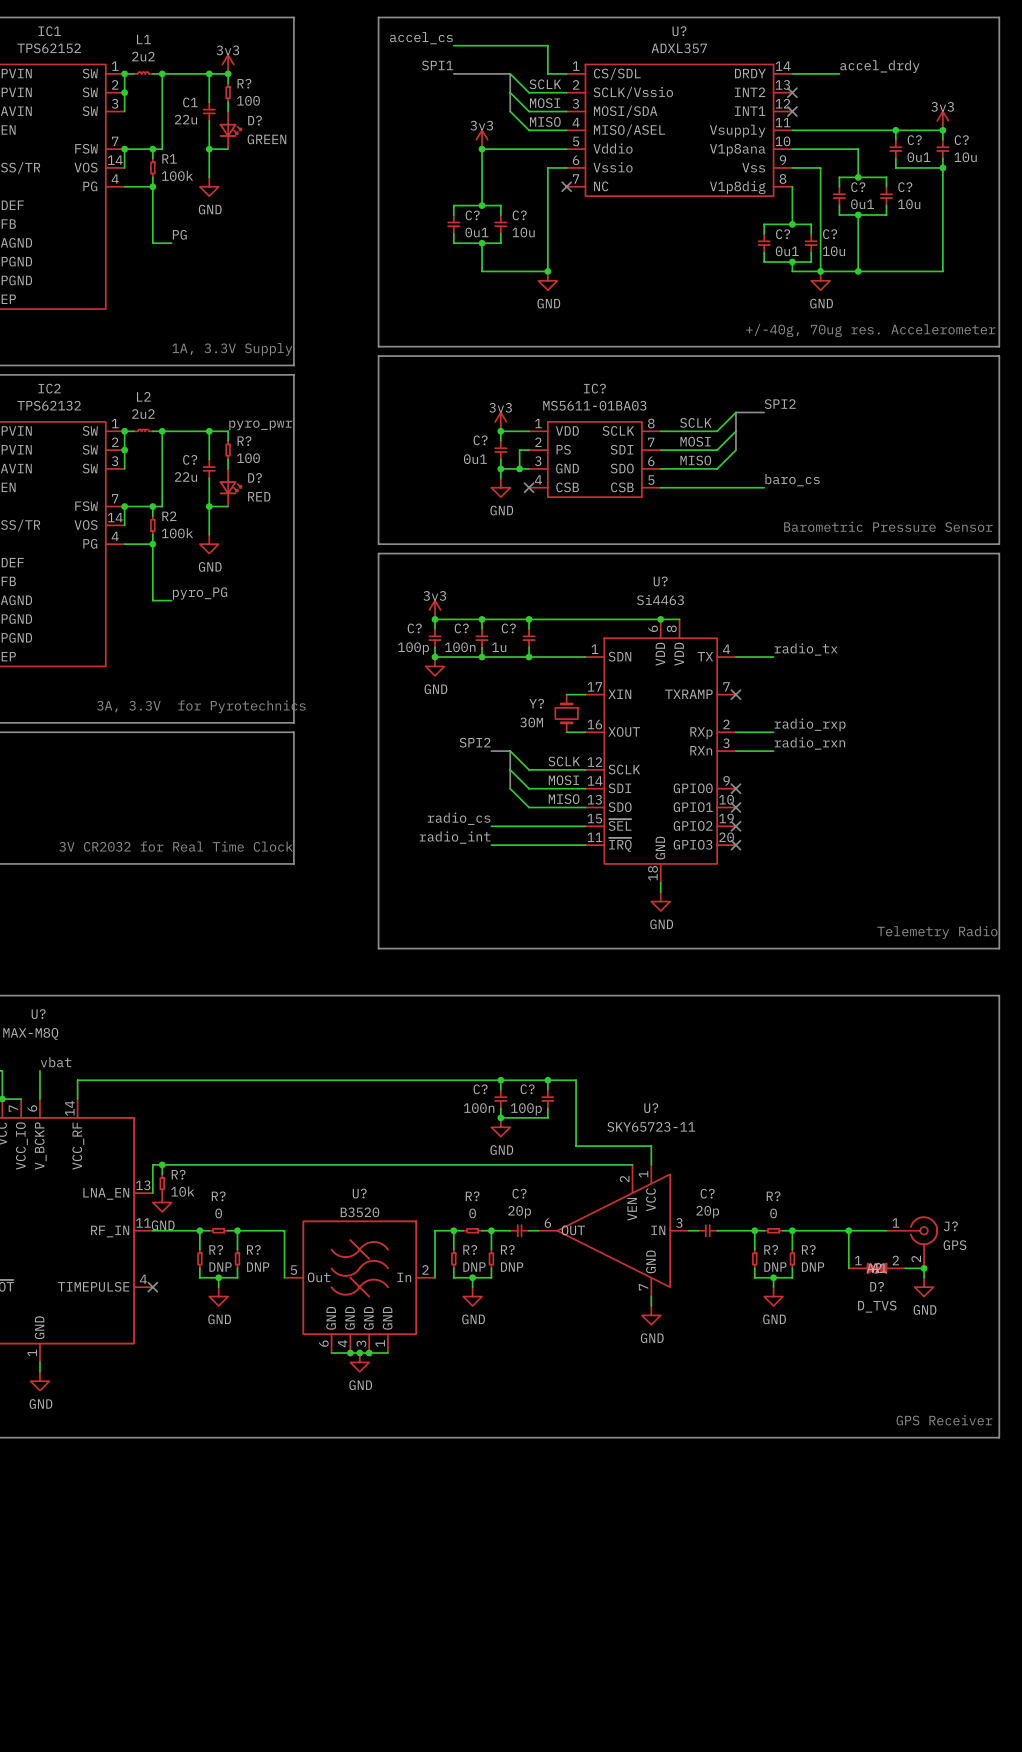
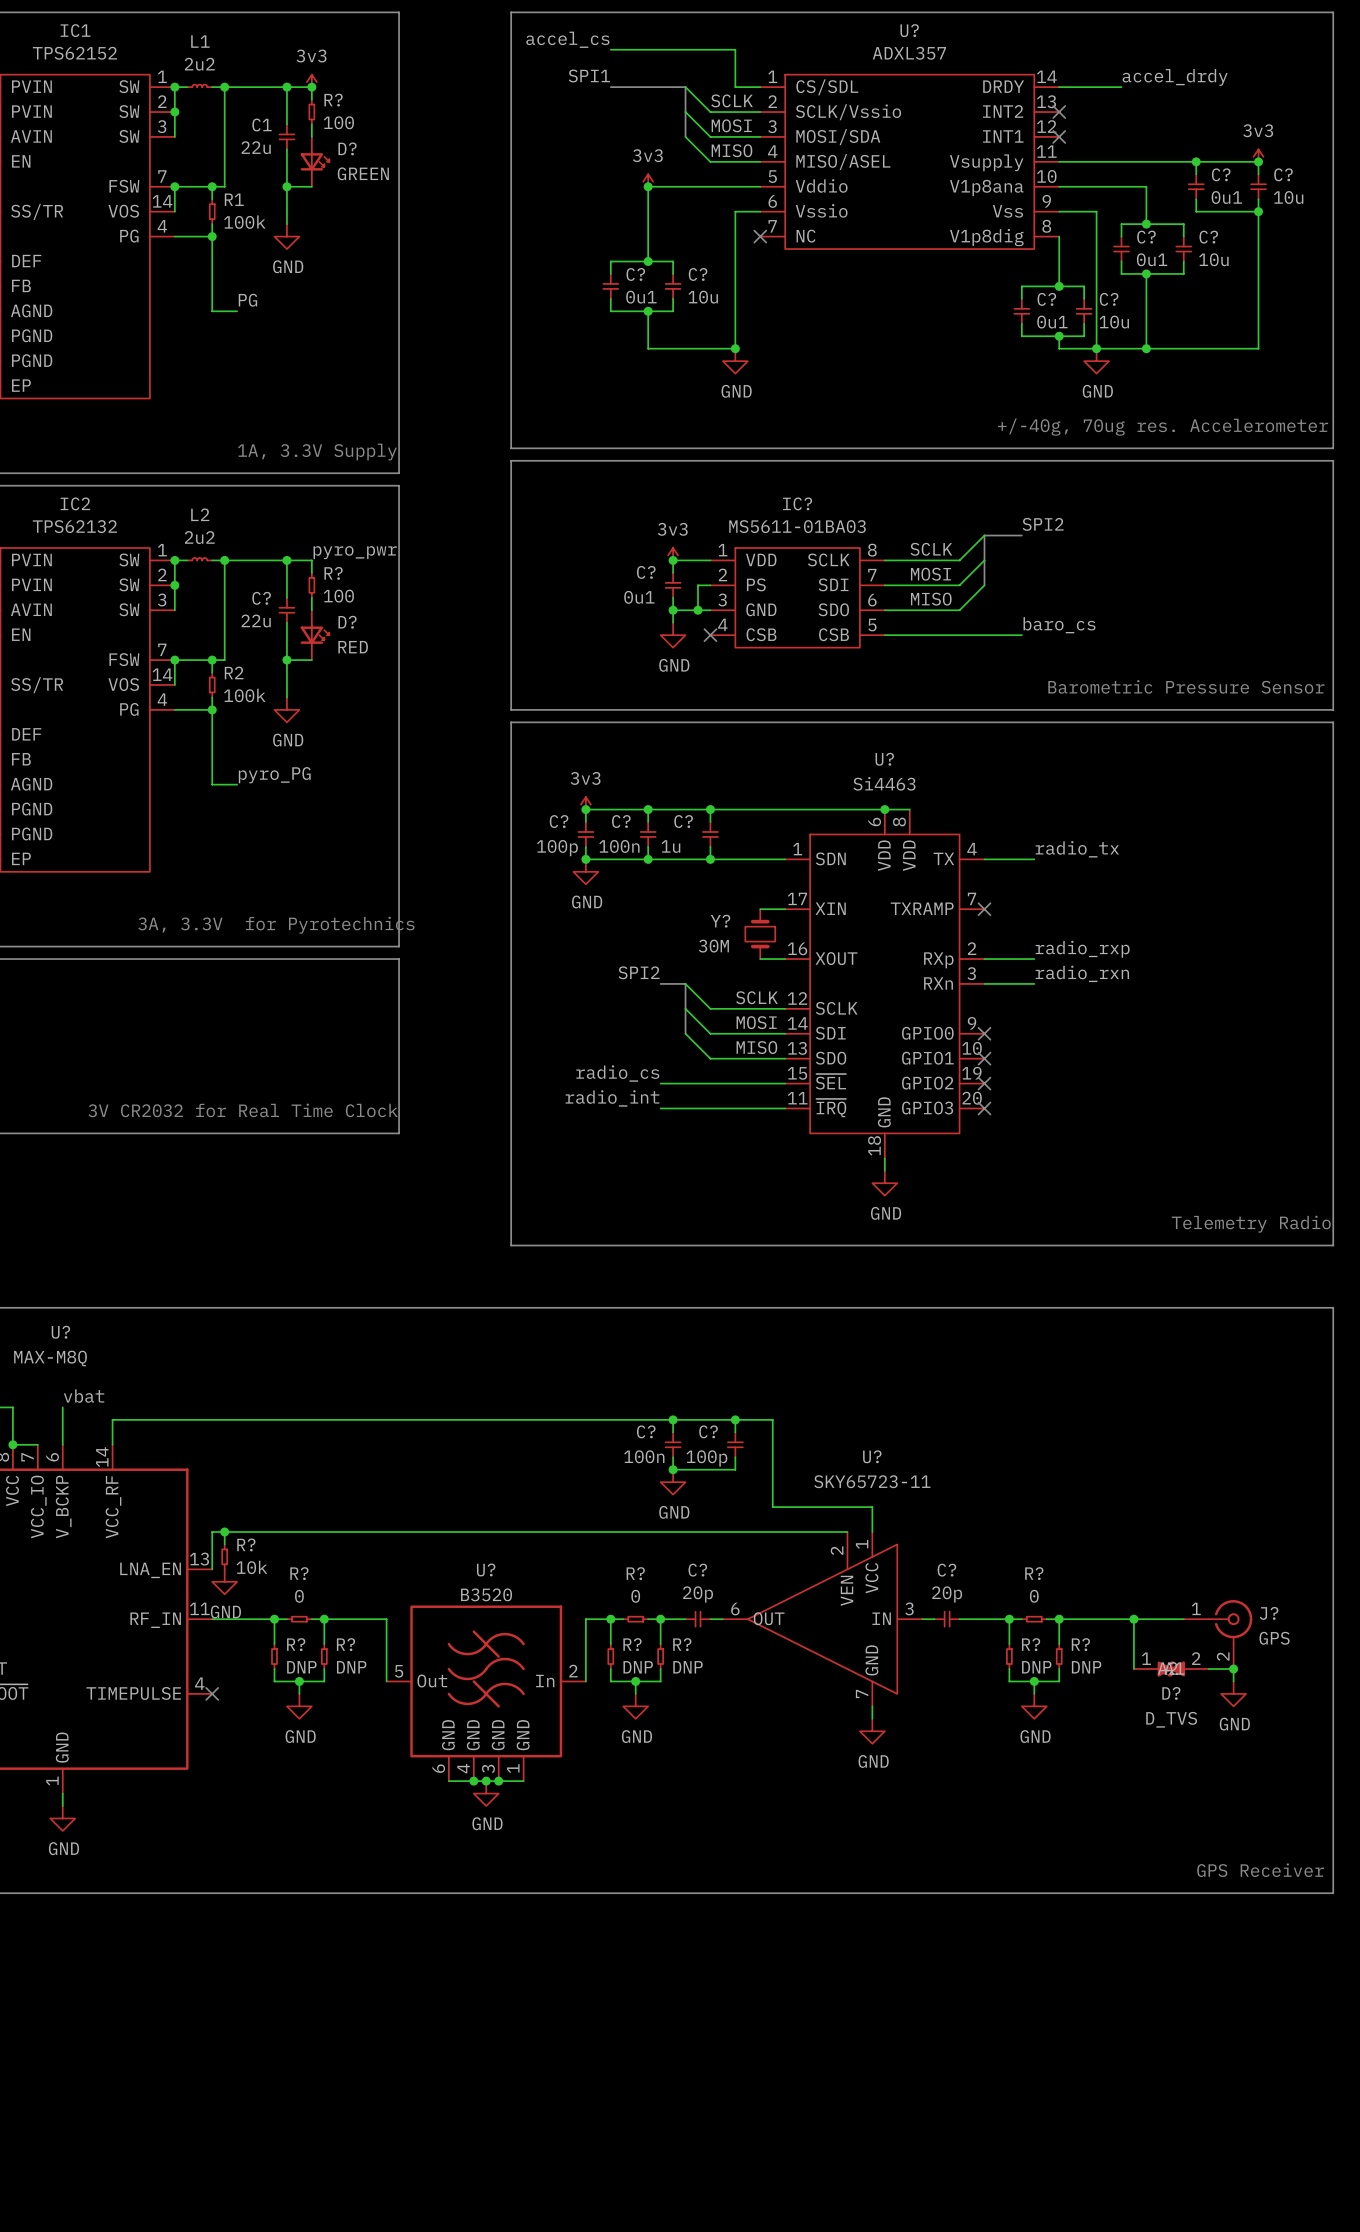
power symbol shape: [222, 55, 234, 74] -> [306, 74, 317, 88]
power symbol shape: [937, 111, 949, 131] -> [1253, 149, 1264, 162]
power symbol shape: [476, 130, 488, 150] -> [643, 174, 654, 187]
power symbol shape: [495, 412, 507, 432] -> [668, 547, 679, 561]
power symbol shape: [429, 600, 441, 620] -> [580, 797, 591, 810]

